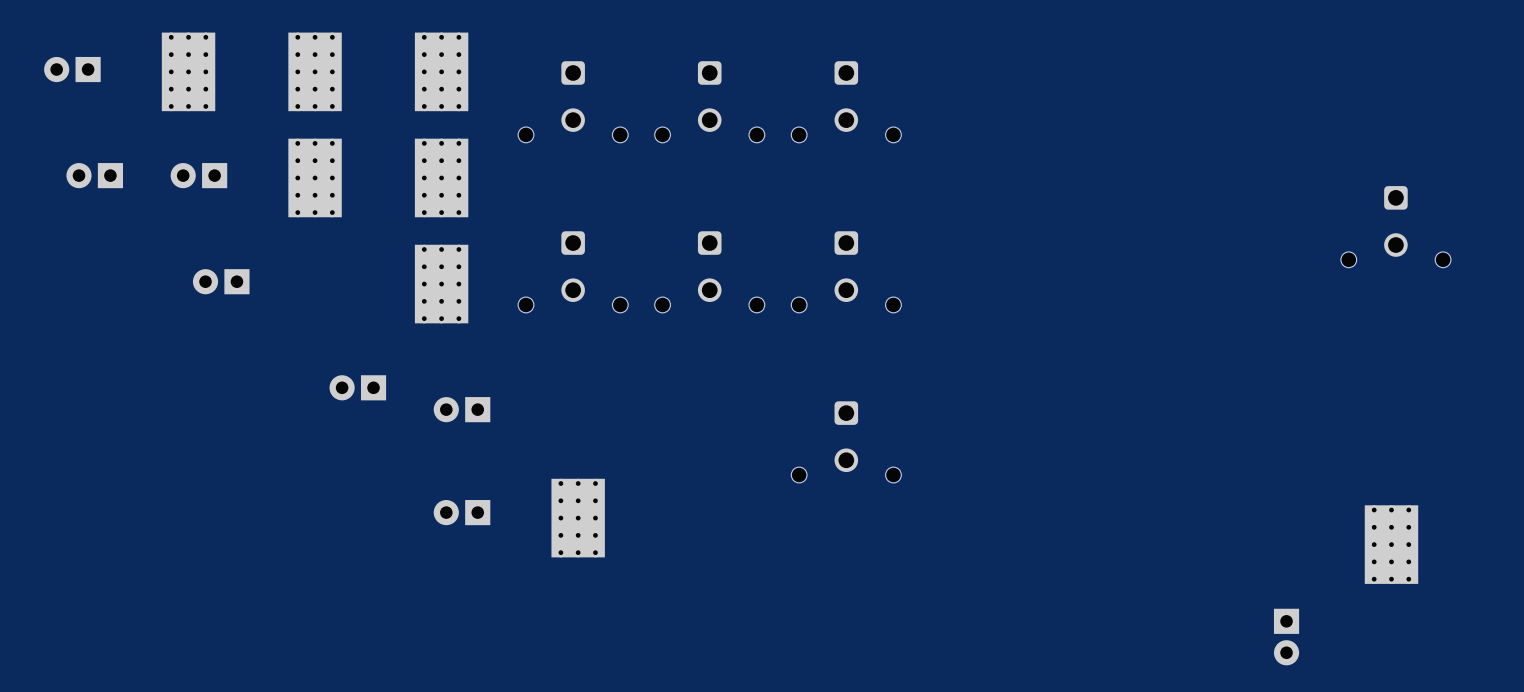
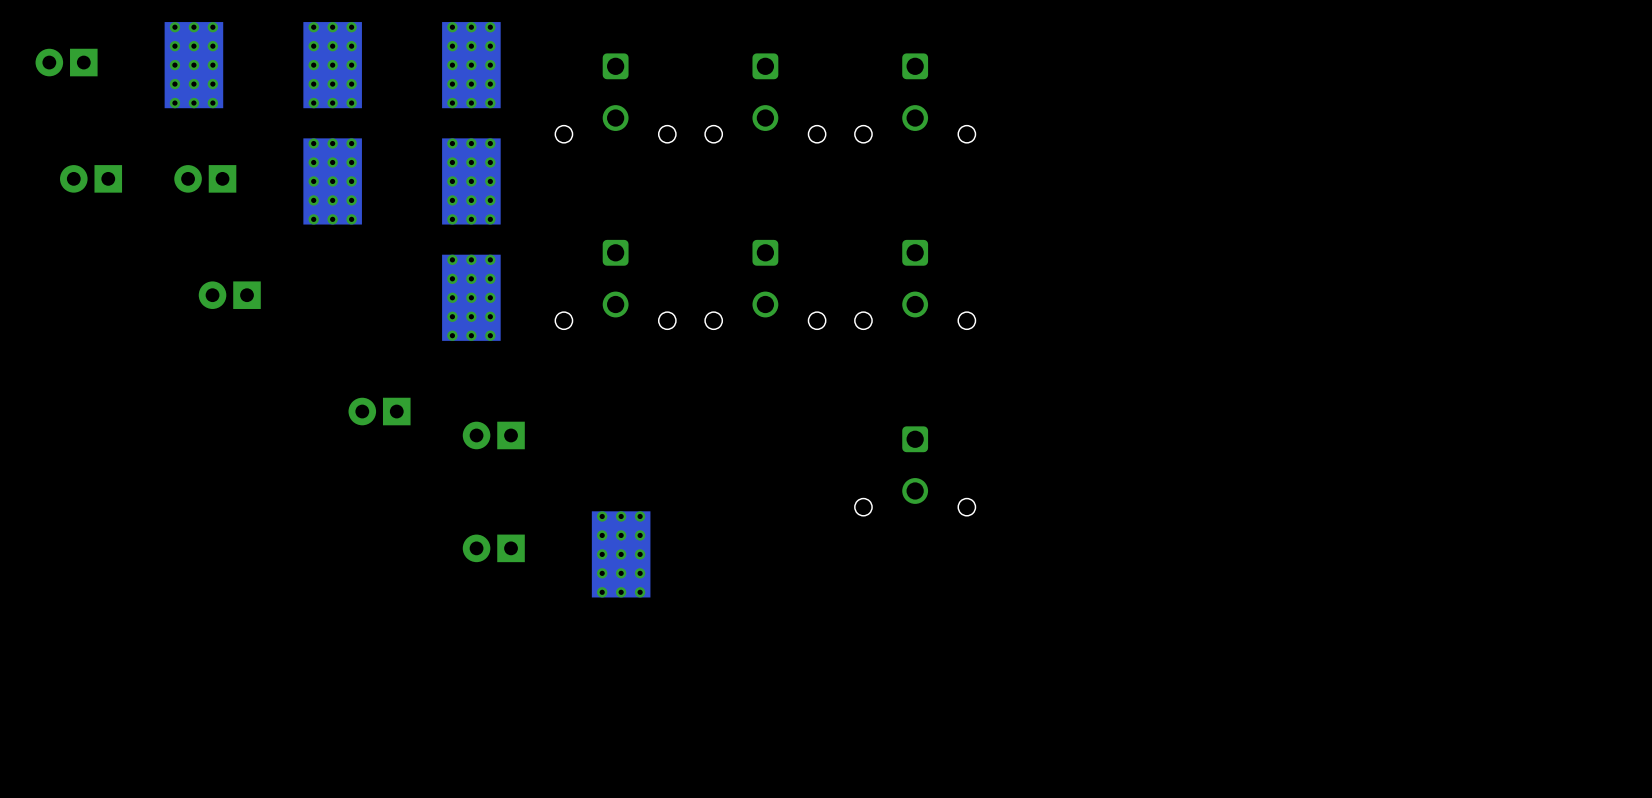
part: (1395, 226) -> none
part: (1391, 544) -> none
part: (1286, 637) -> none

